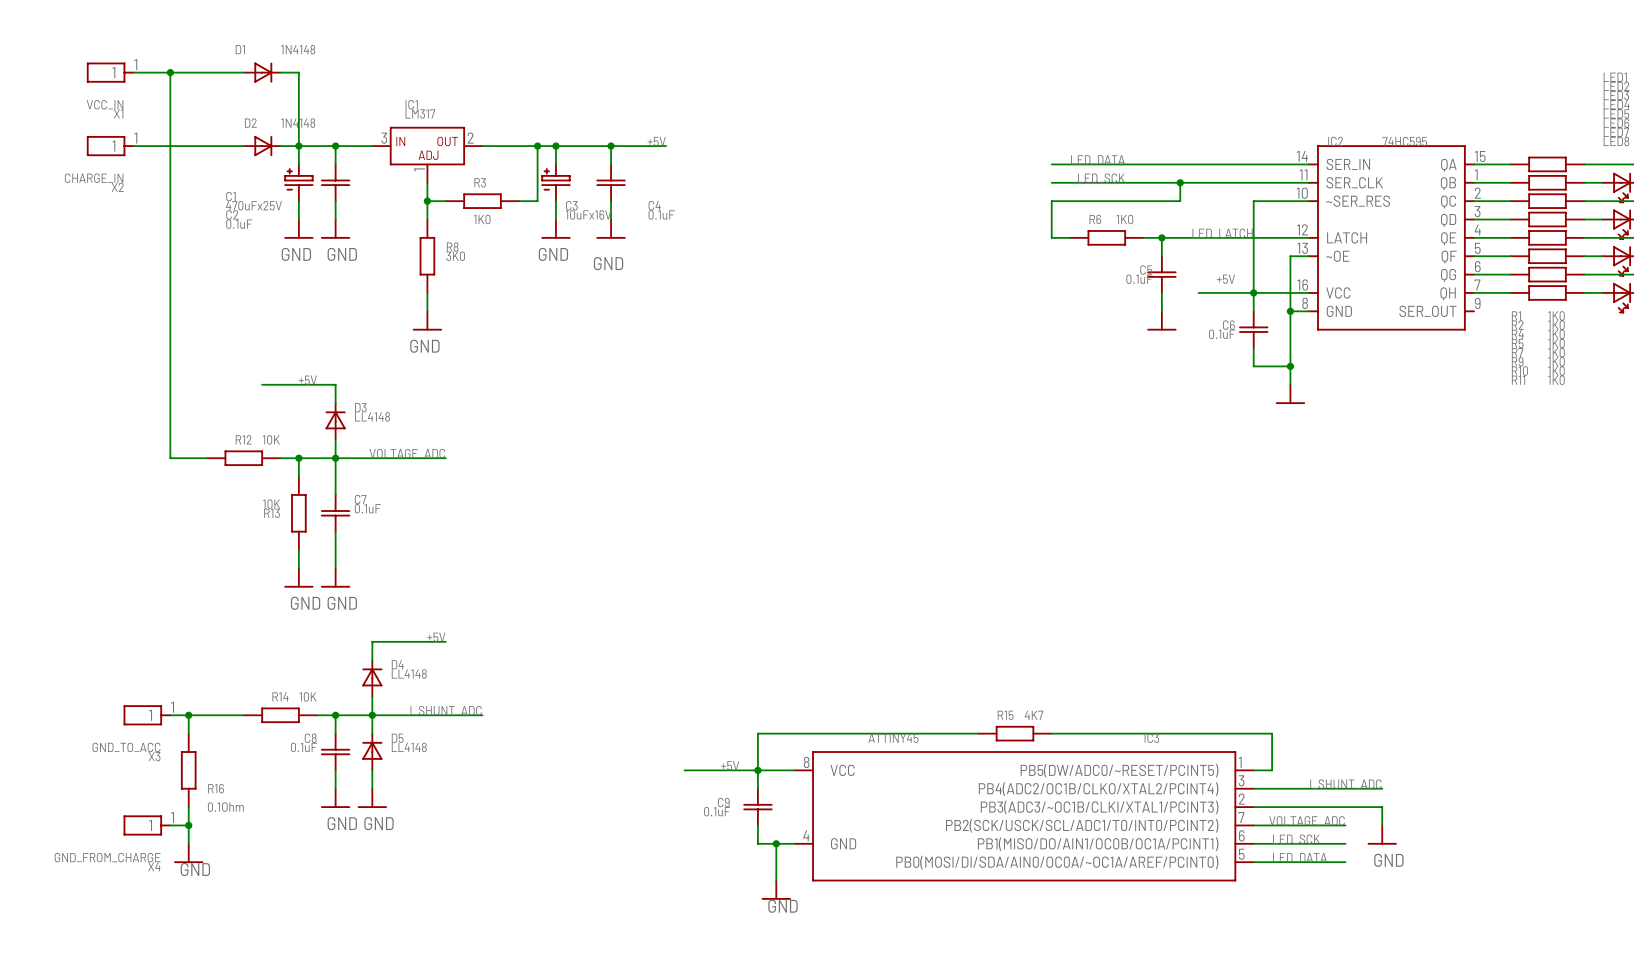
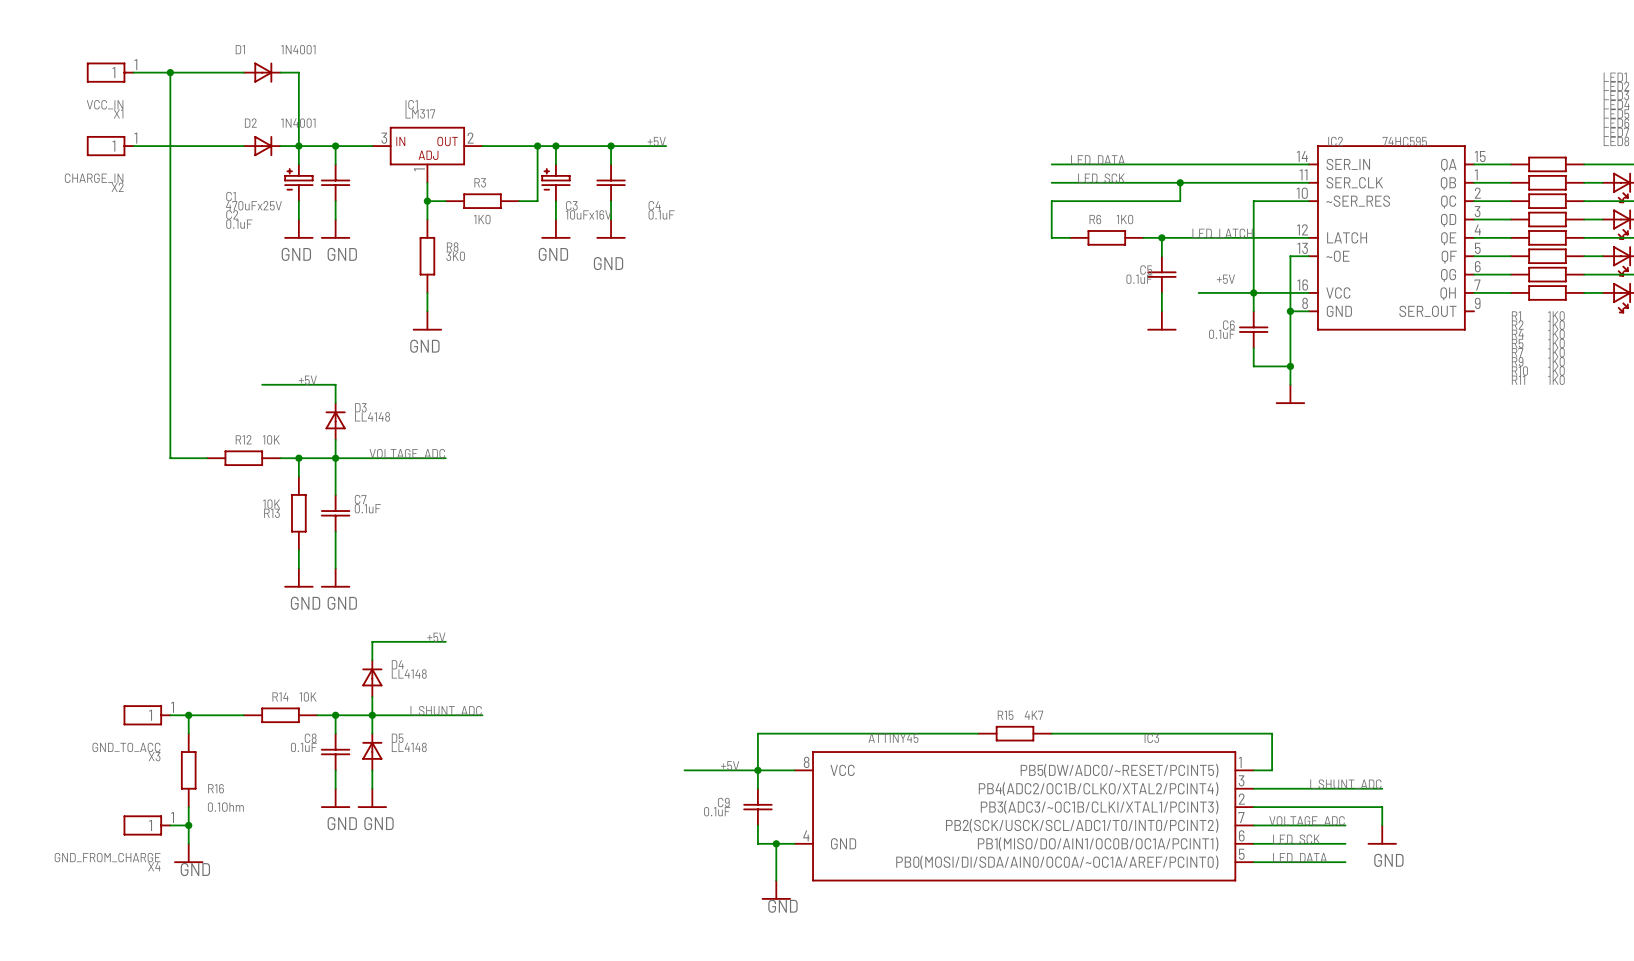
D1 value: 1N4148 (298, 49) -> 1N4001 (298, 49)
D2 value: 1N4148 (298, 123) -> 1N4001 (298, 123)

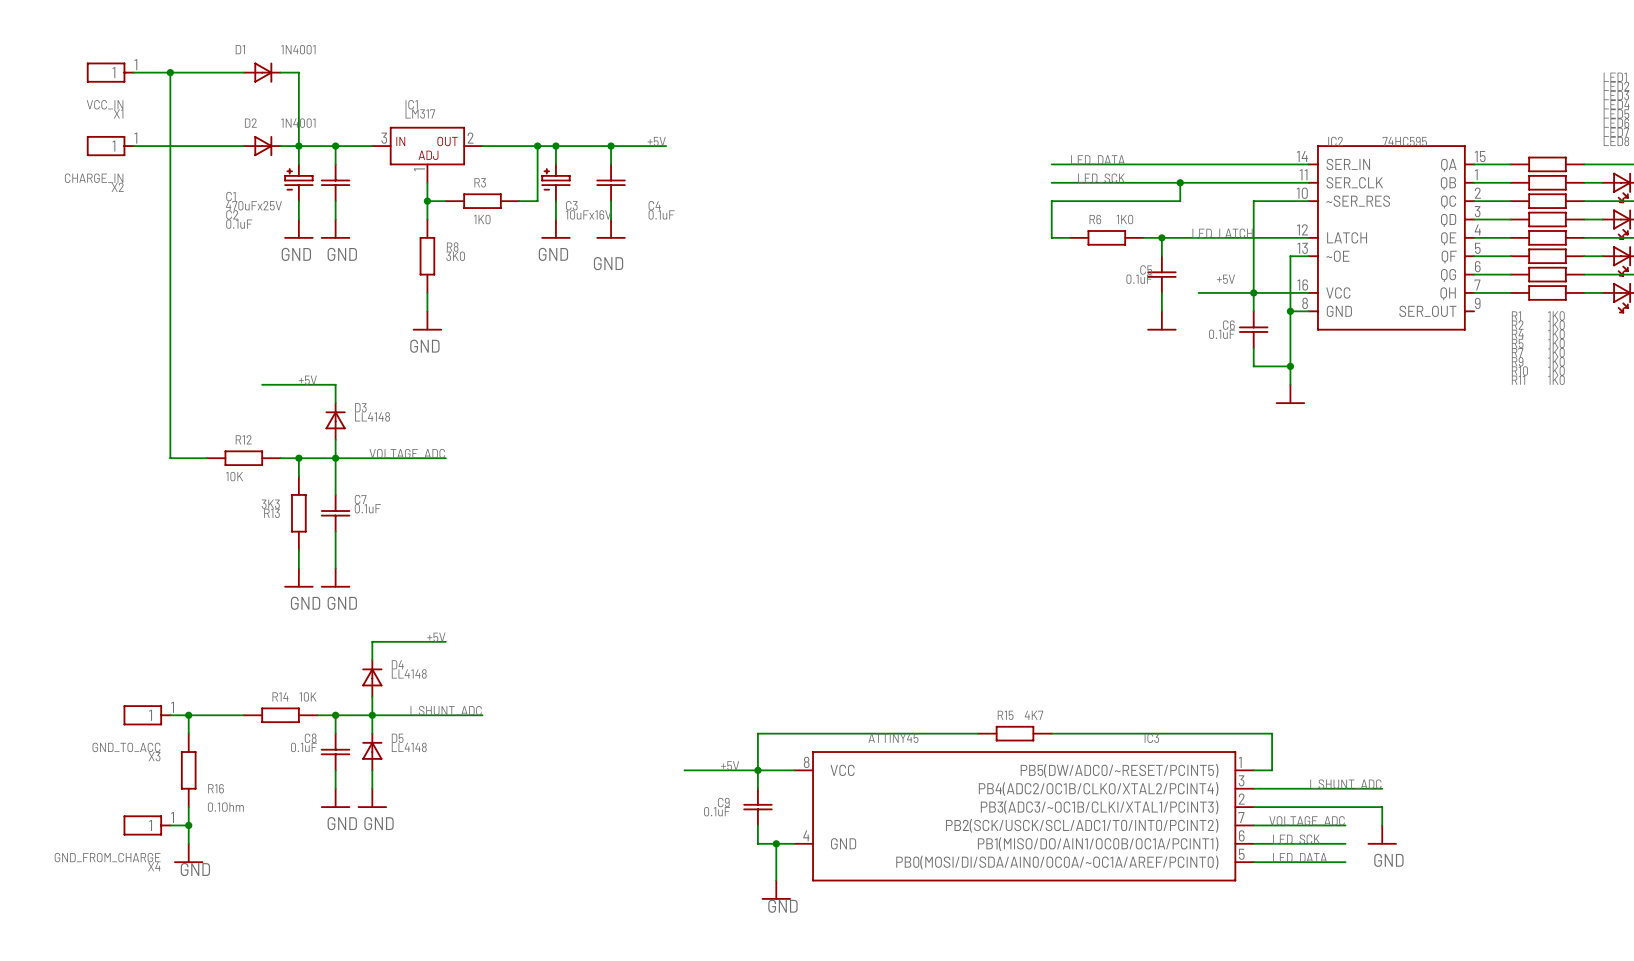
R12 value position: 10K (271, 439) -> 10K (234, 476)
R13 value: 10K (271, 504) -> 3K3 (270, 504)

